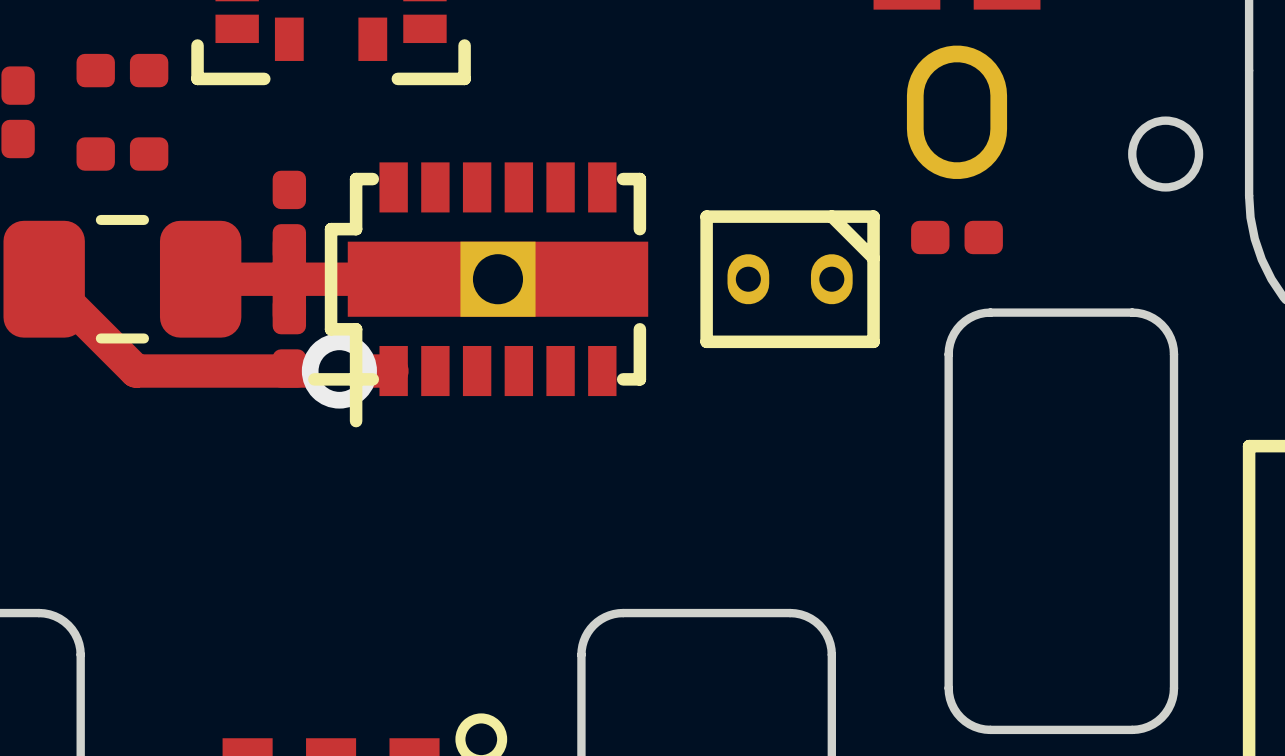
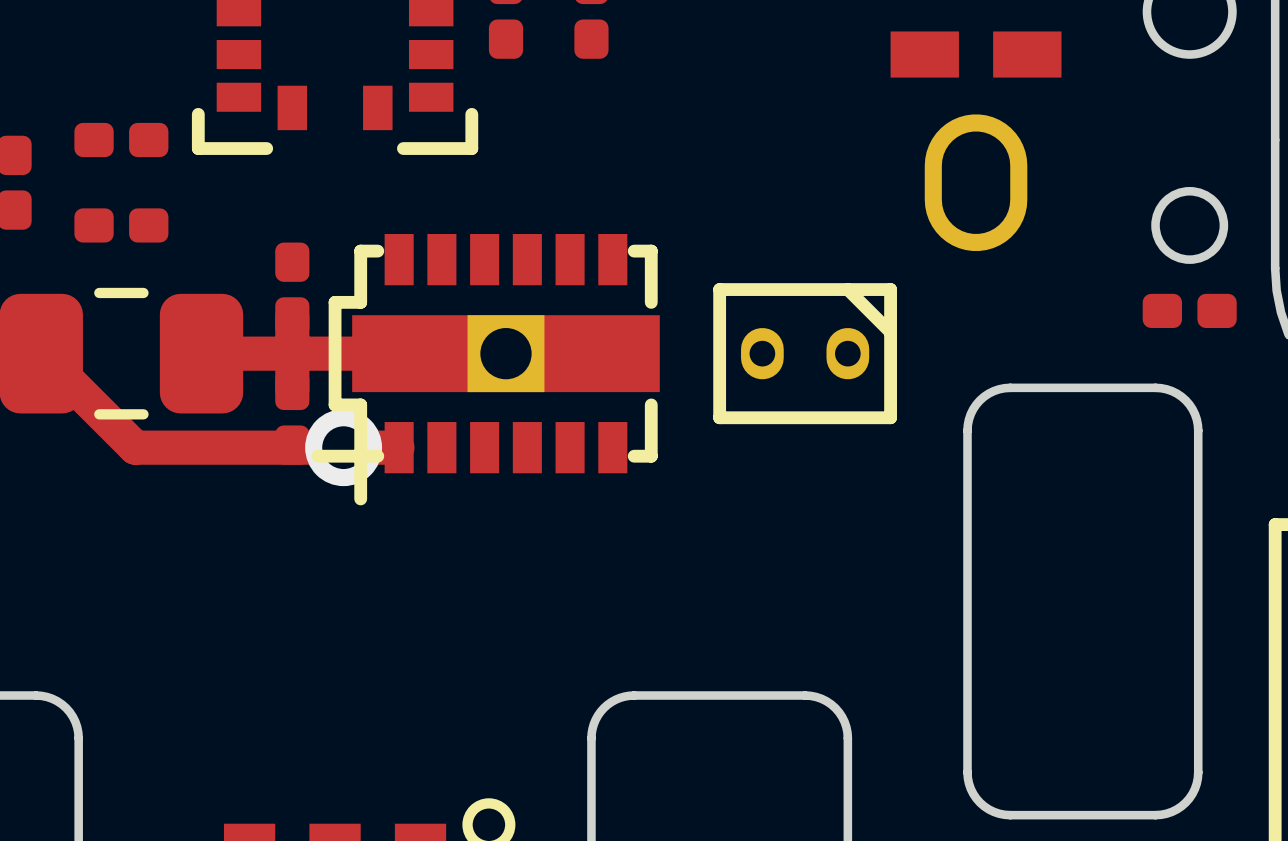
part position: (957, 237) -> (1189, 310)

